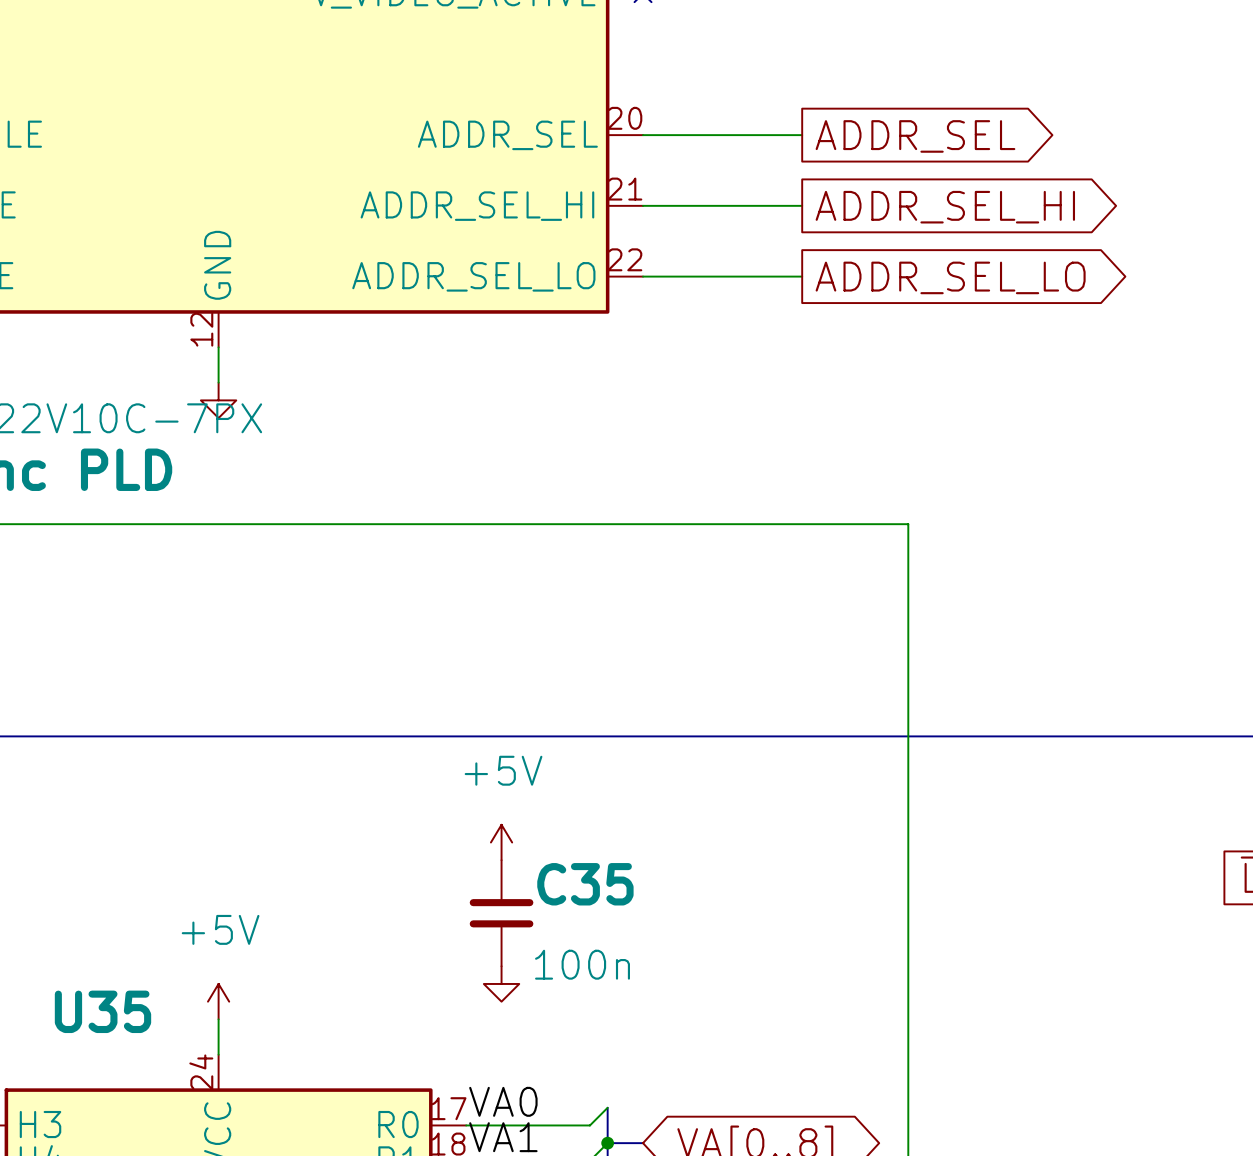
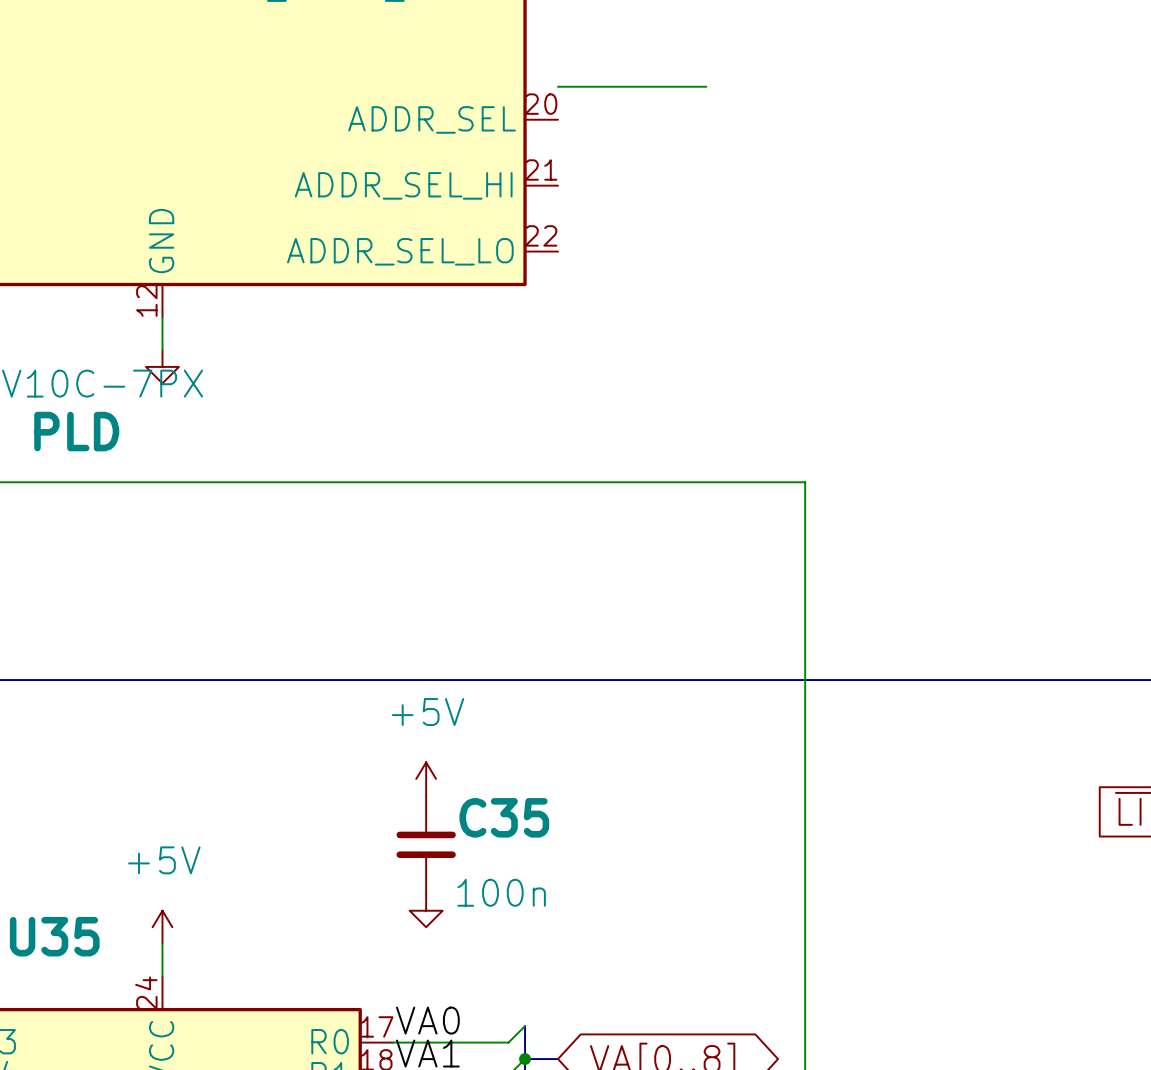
wire: (643, 135) (802, 135) -> (557, 86) (706, 86)
global label: ADDR_SEL (915, 136) -> none
wire: (643, 205) (802, 205) -> none
global label: ADDR_SEL_HI (945, 207) -> none
wire: (643, 276) (802, 276) -> none
global label: ADDR_SEL_LO (950, 277) -> none

